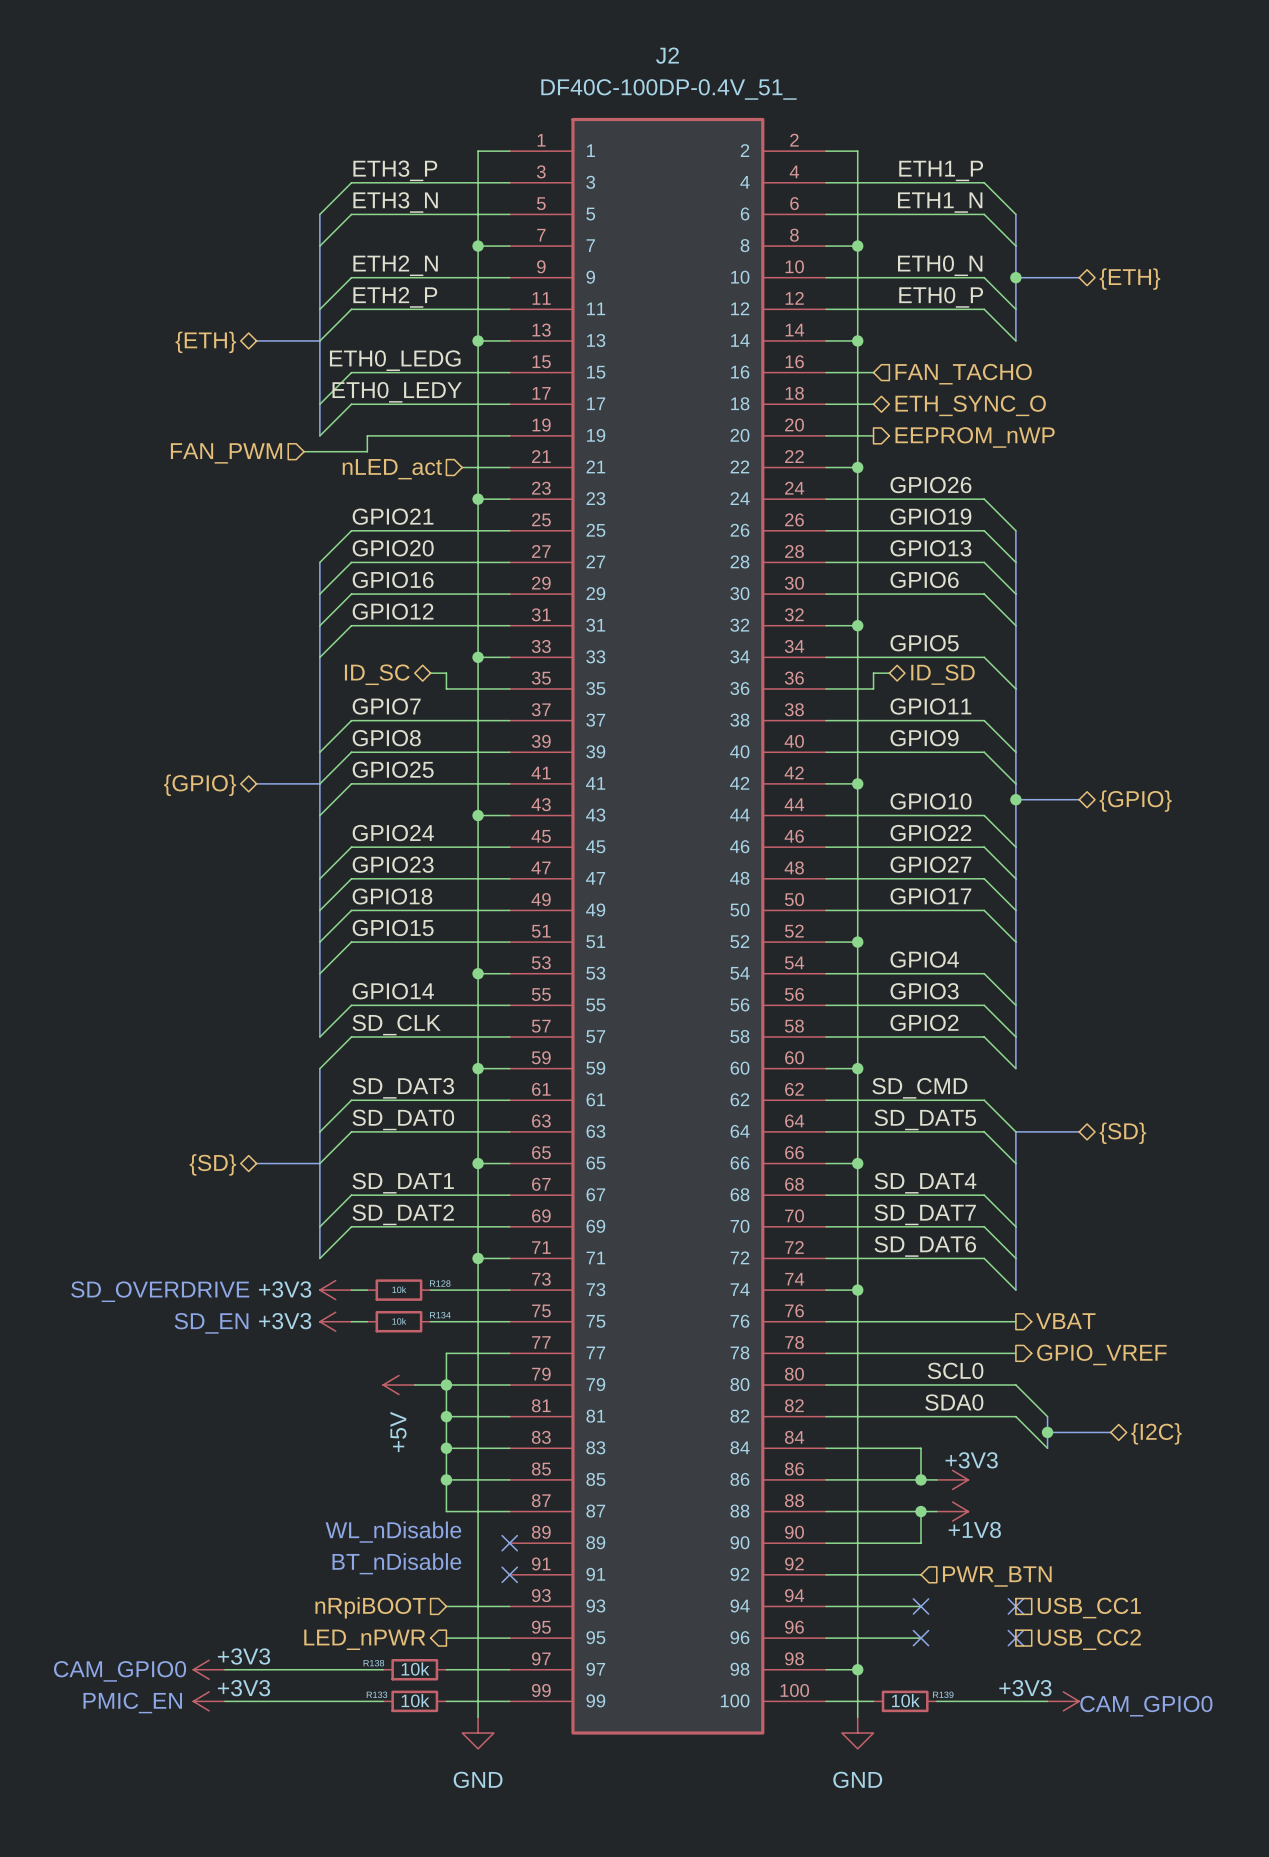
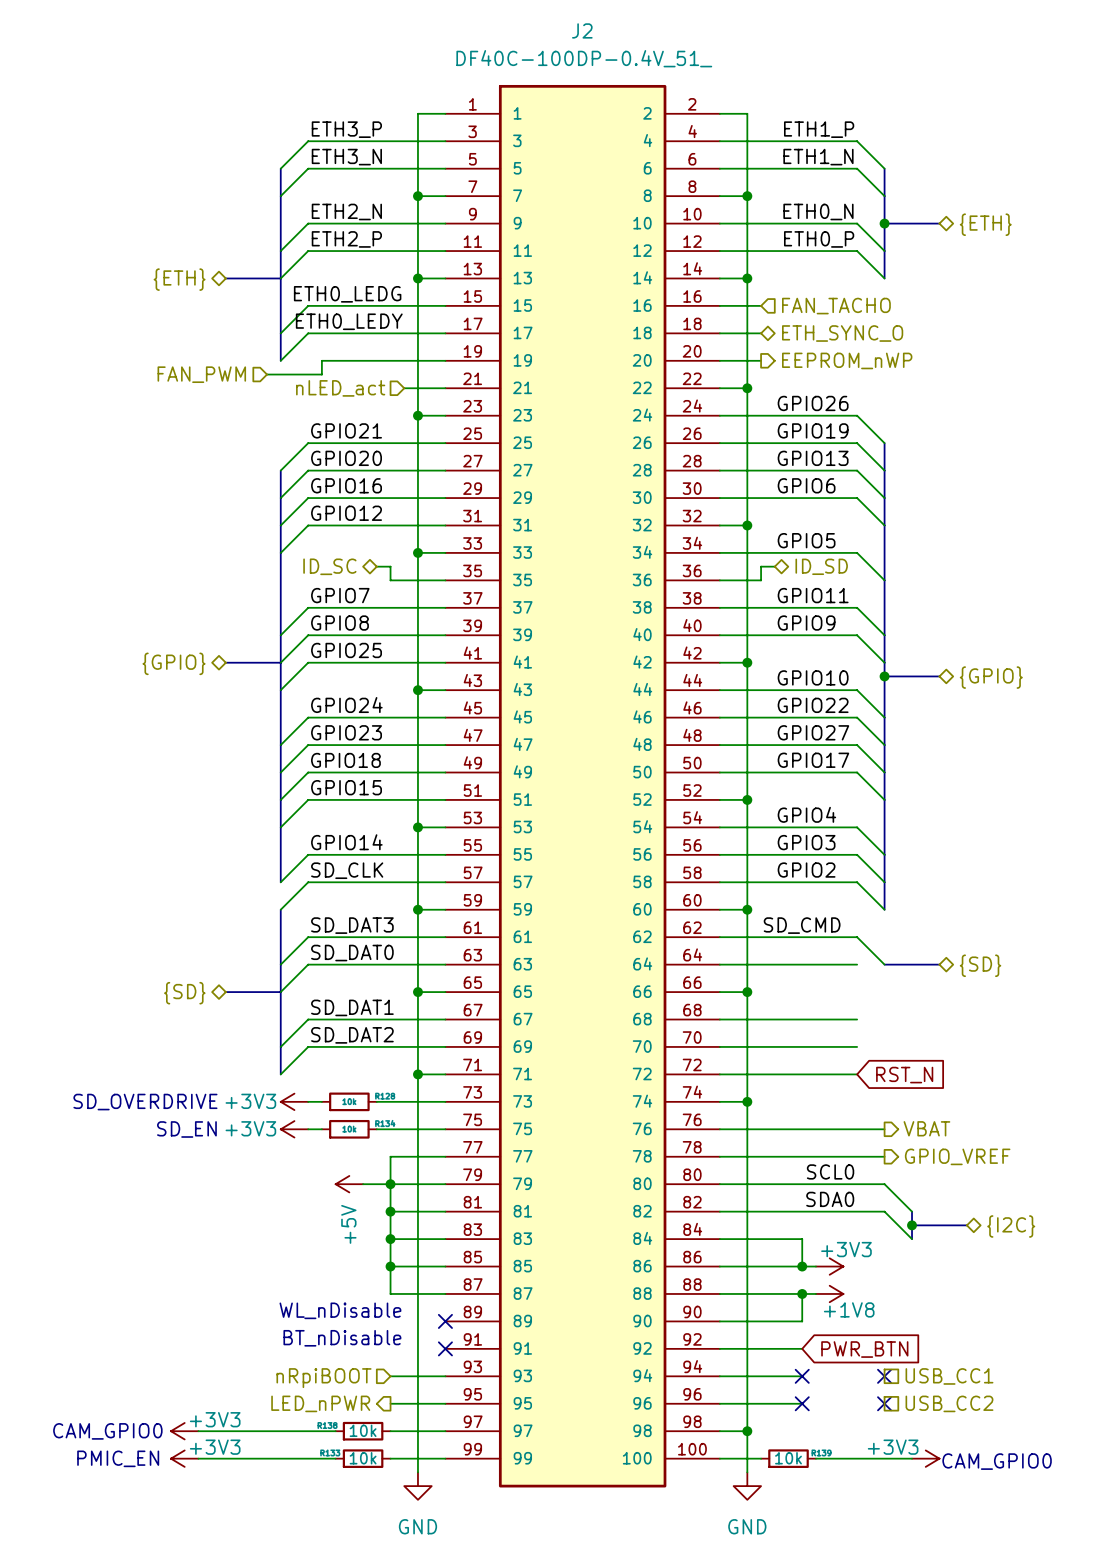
label: SD_DAT5 (925, 1119) -> none
wire: (984, 1131) (1015, 1163) -> none
bus: (1015, 1131) (1015, 1290) -> none
label: SD_DAT4 (925, 1183) -> none
wire: (984, 1195) (1015, 1226) -> none
label: SD_DAT7 (925, 1214) -> none
wire: (984, 1226) (1015, 1258) -> none
label: SD_DAT6 (925, 1246) -> none
wire: (984, 1258) (1015, 1290) -> none
global label: none -> RST_N (904, 1075)
hierarchical label: PWR_BTN (997, 1576) -> none
global label: none -> PWR_BTN (864, 1349)

